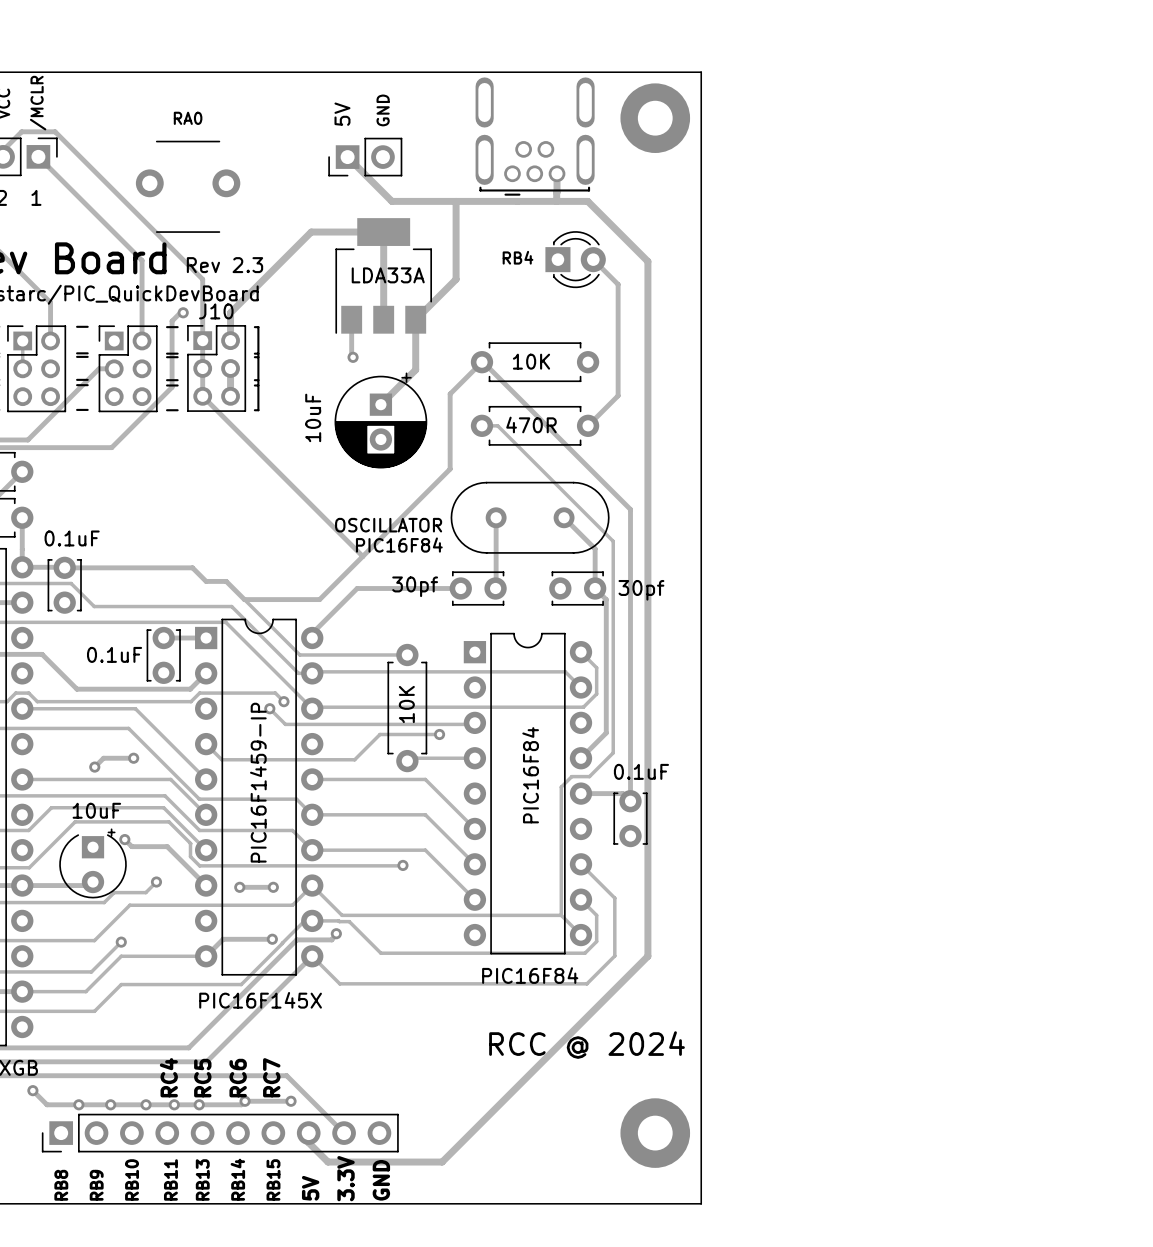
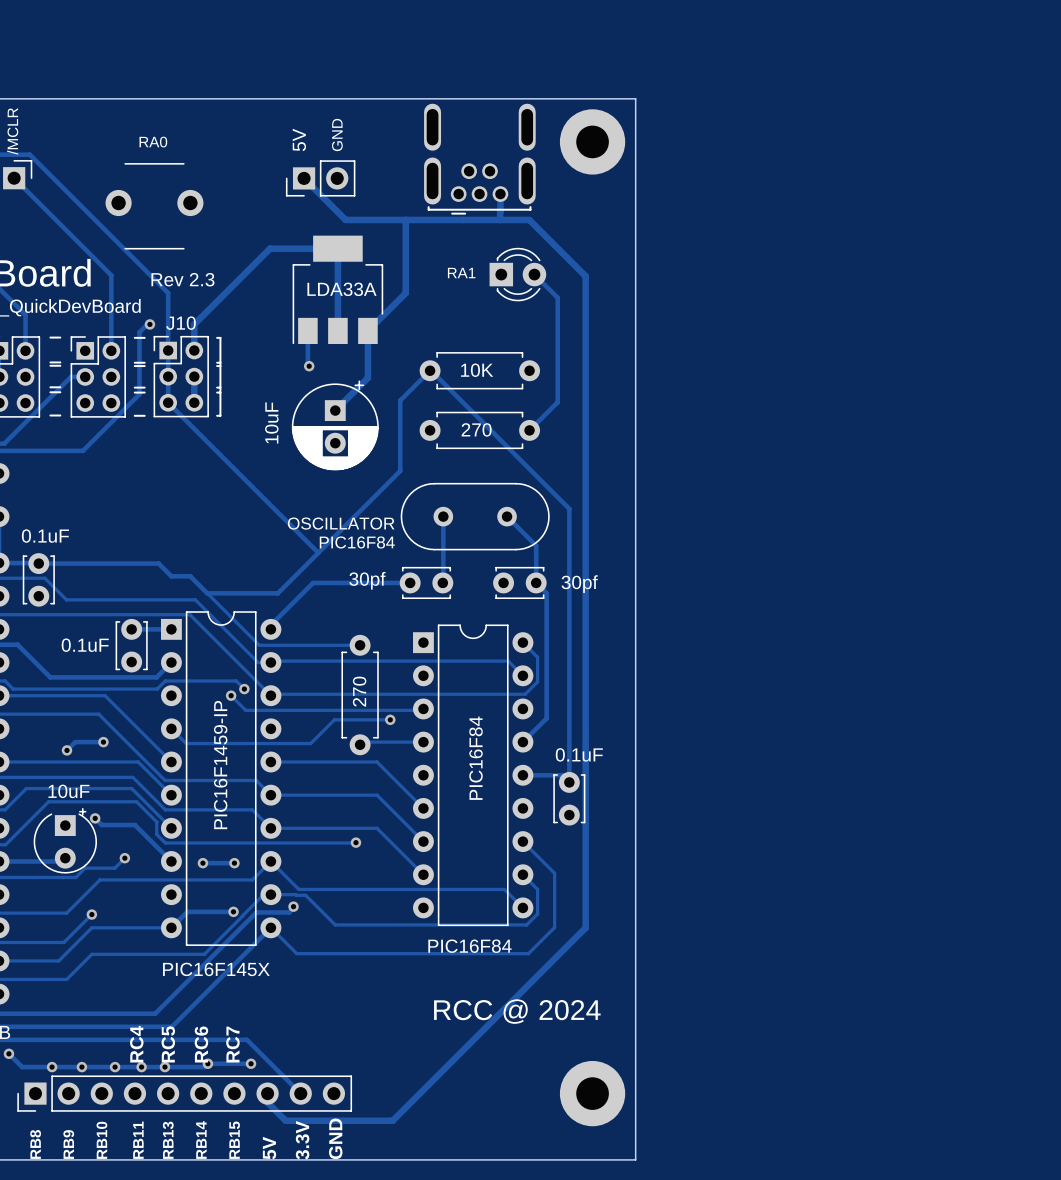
text: RB4 (518, 257) -> RA1 (461, 273)
part value: 470R (531, 424) -> 270 (476, 429)
track: (481, 425) (497, 425) (613, 541) (613, 752) (589, 776) (571, 776) (561, 787) (561, 915) -> none
part value: 10K (406, 704) -> 270 (359, 691)

